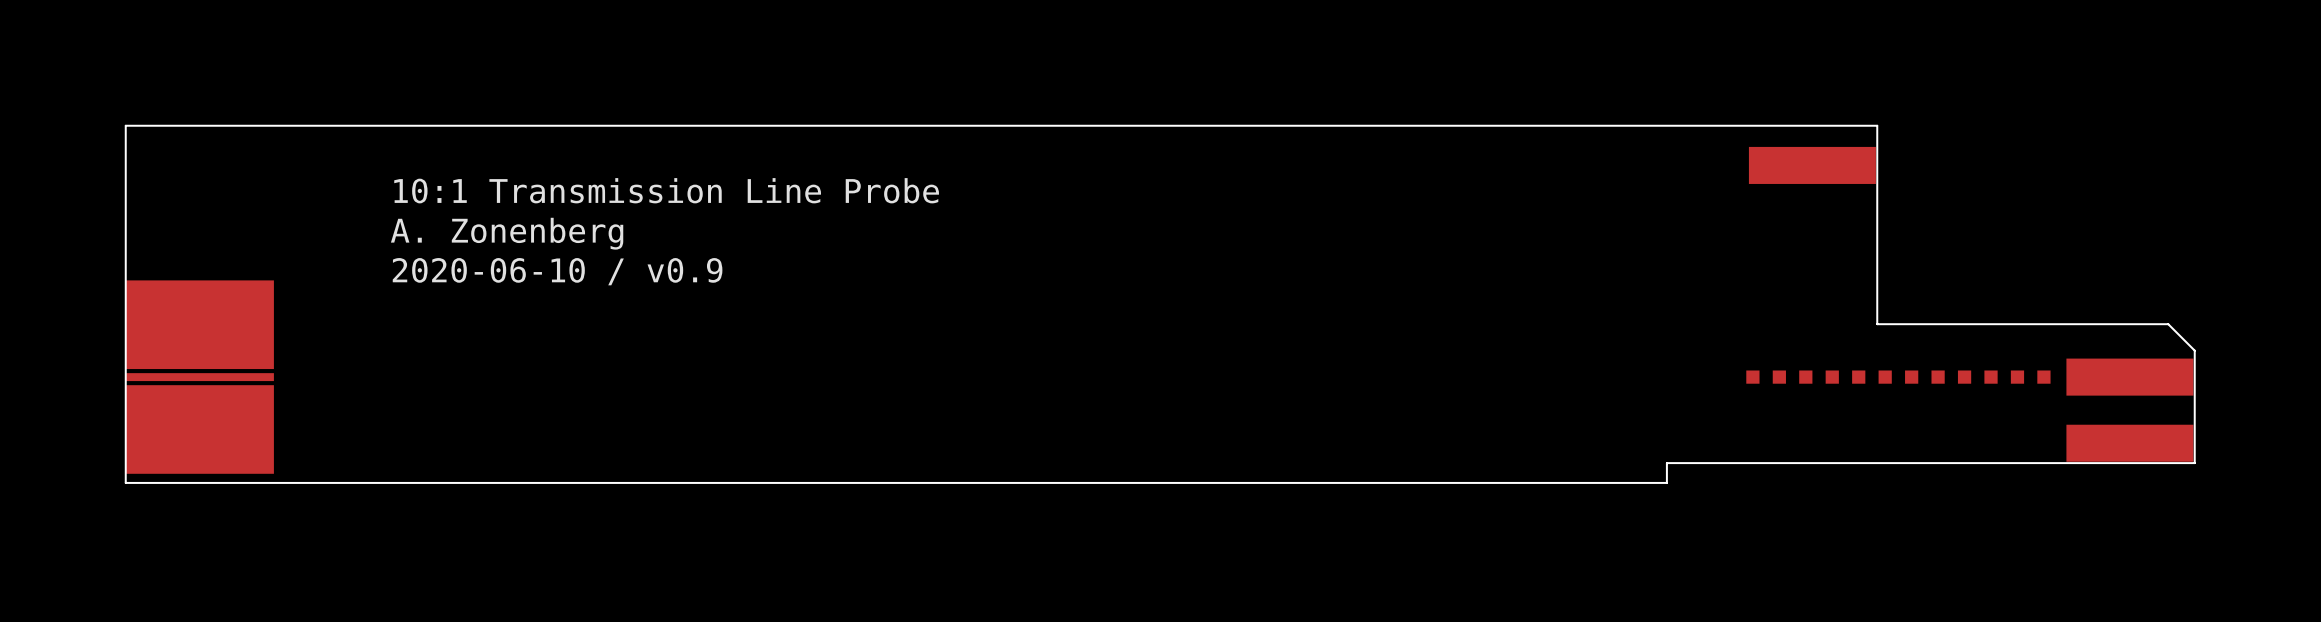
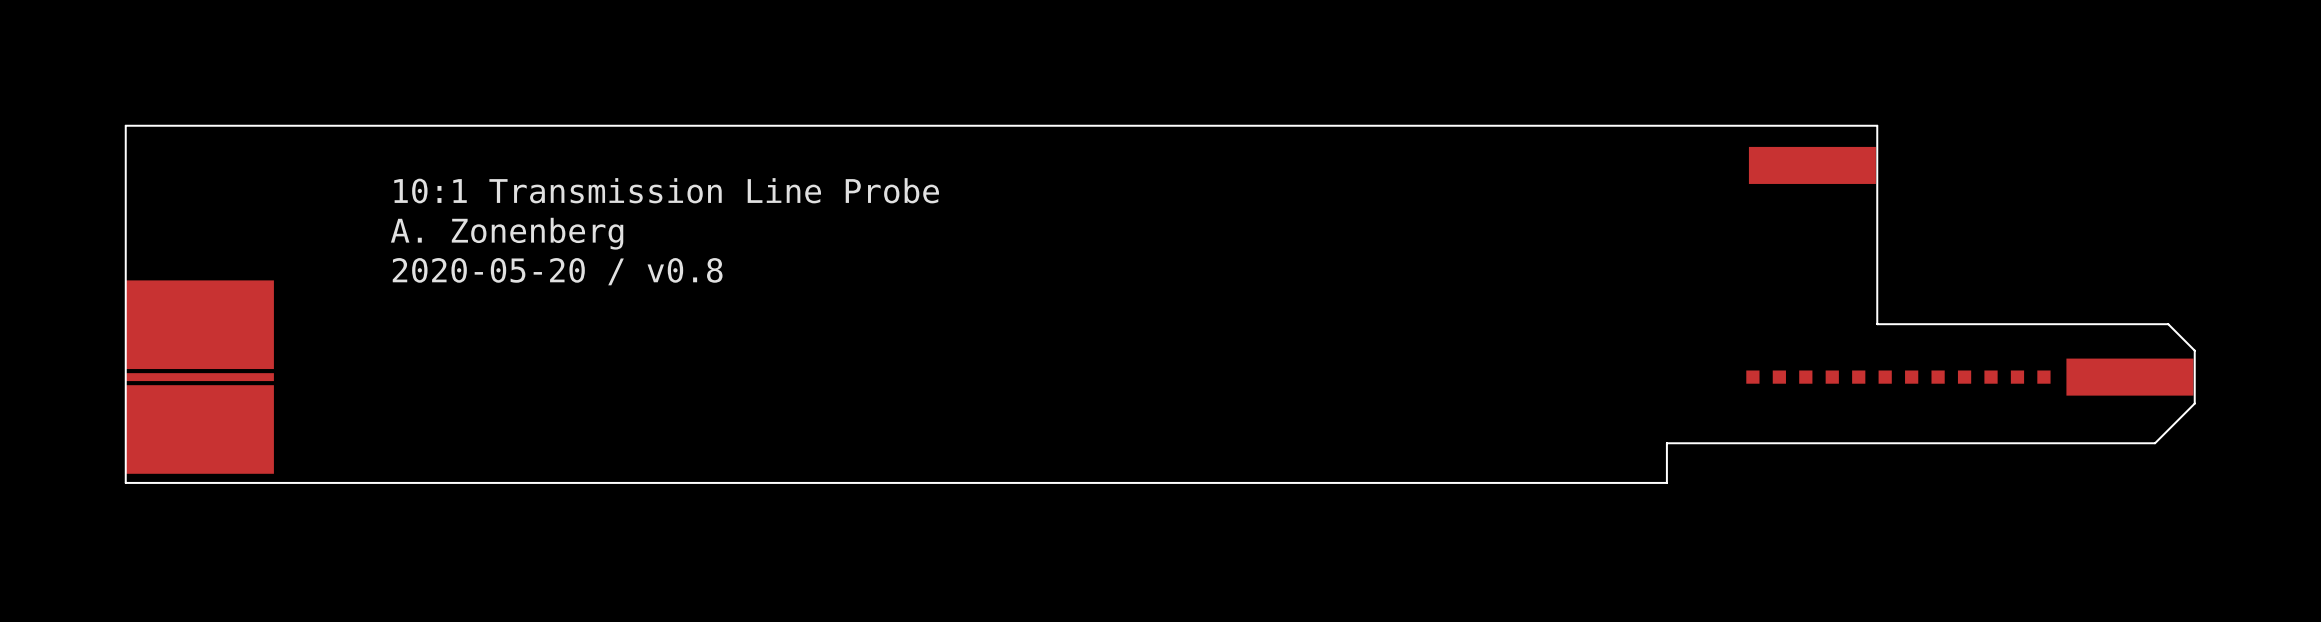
text: 2020-06-10 / v0.9 (557, 271) -> 2020-05-20 / v0.8 (557, 271)
board edge: (2194, 403) (2194, 463) (1666, 463) -> (2194, 403) (2155, 443) (1666, 443) (1666, 463)
part: (2129, 443) -> none

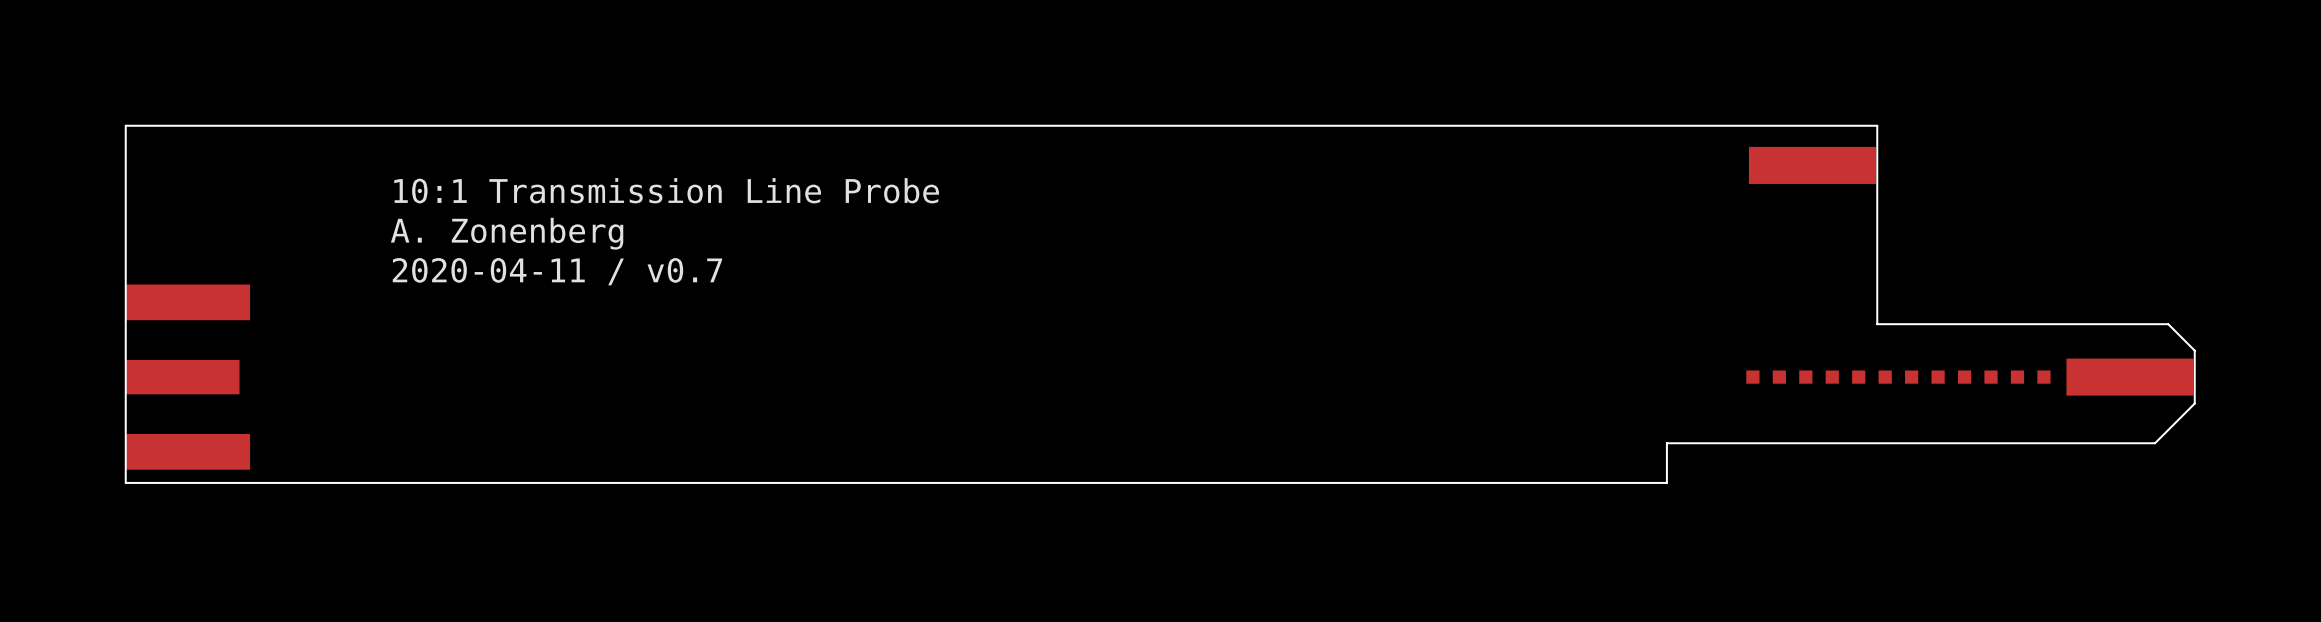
text: 2020-05-20 / v0.8 (557, 271) -> 2020-04-11 / v0.7 (557, 271)
part footprint: [125, 280, 274, 474] -> [125, 284, 251, 470]

